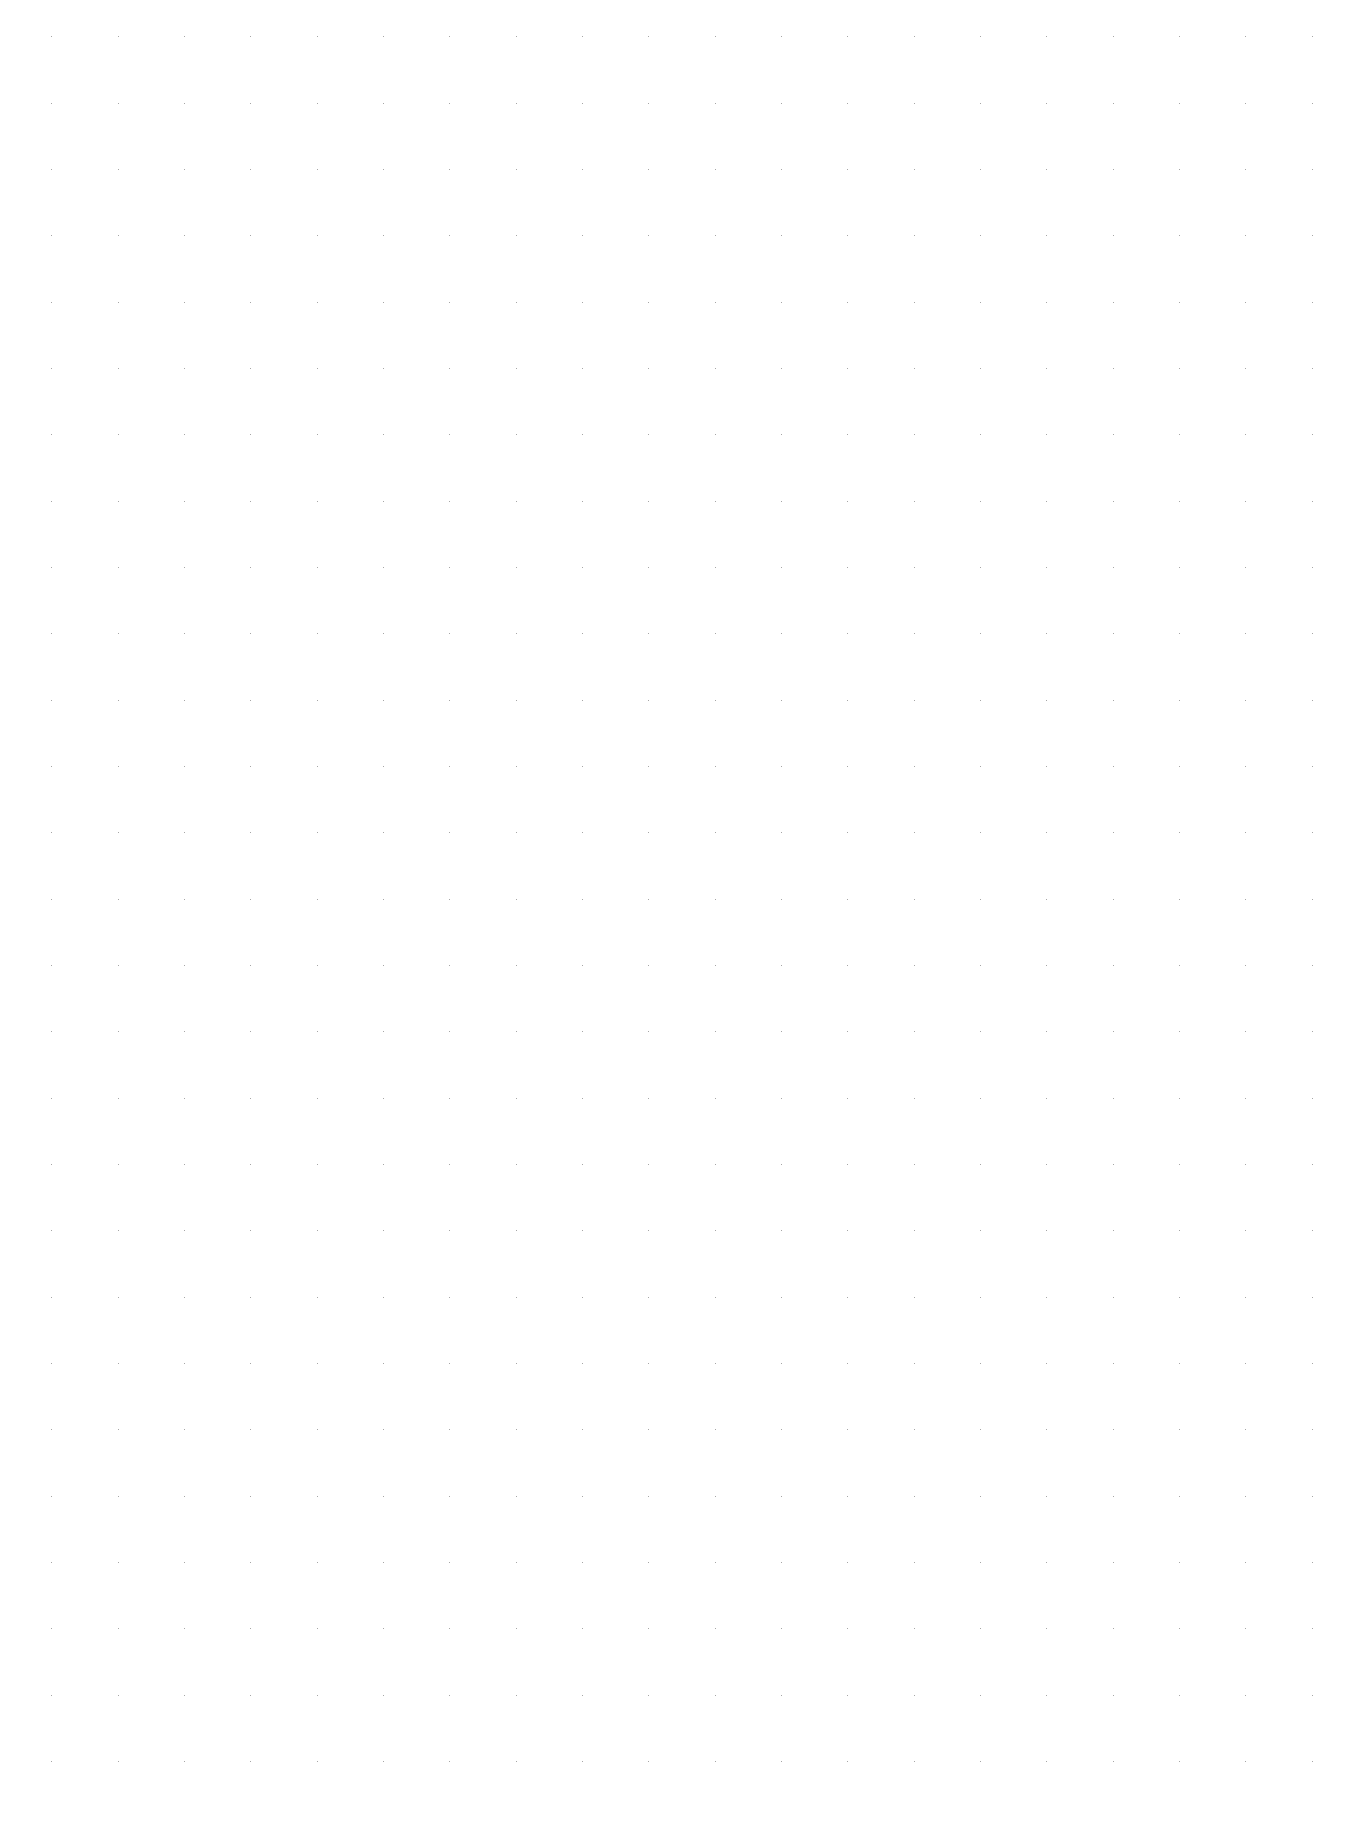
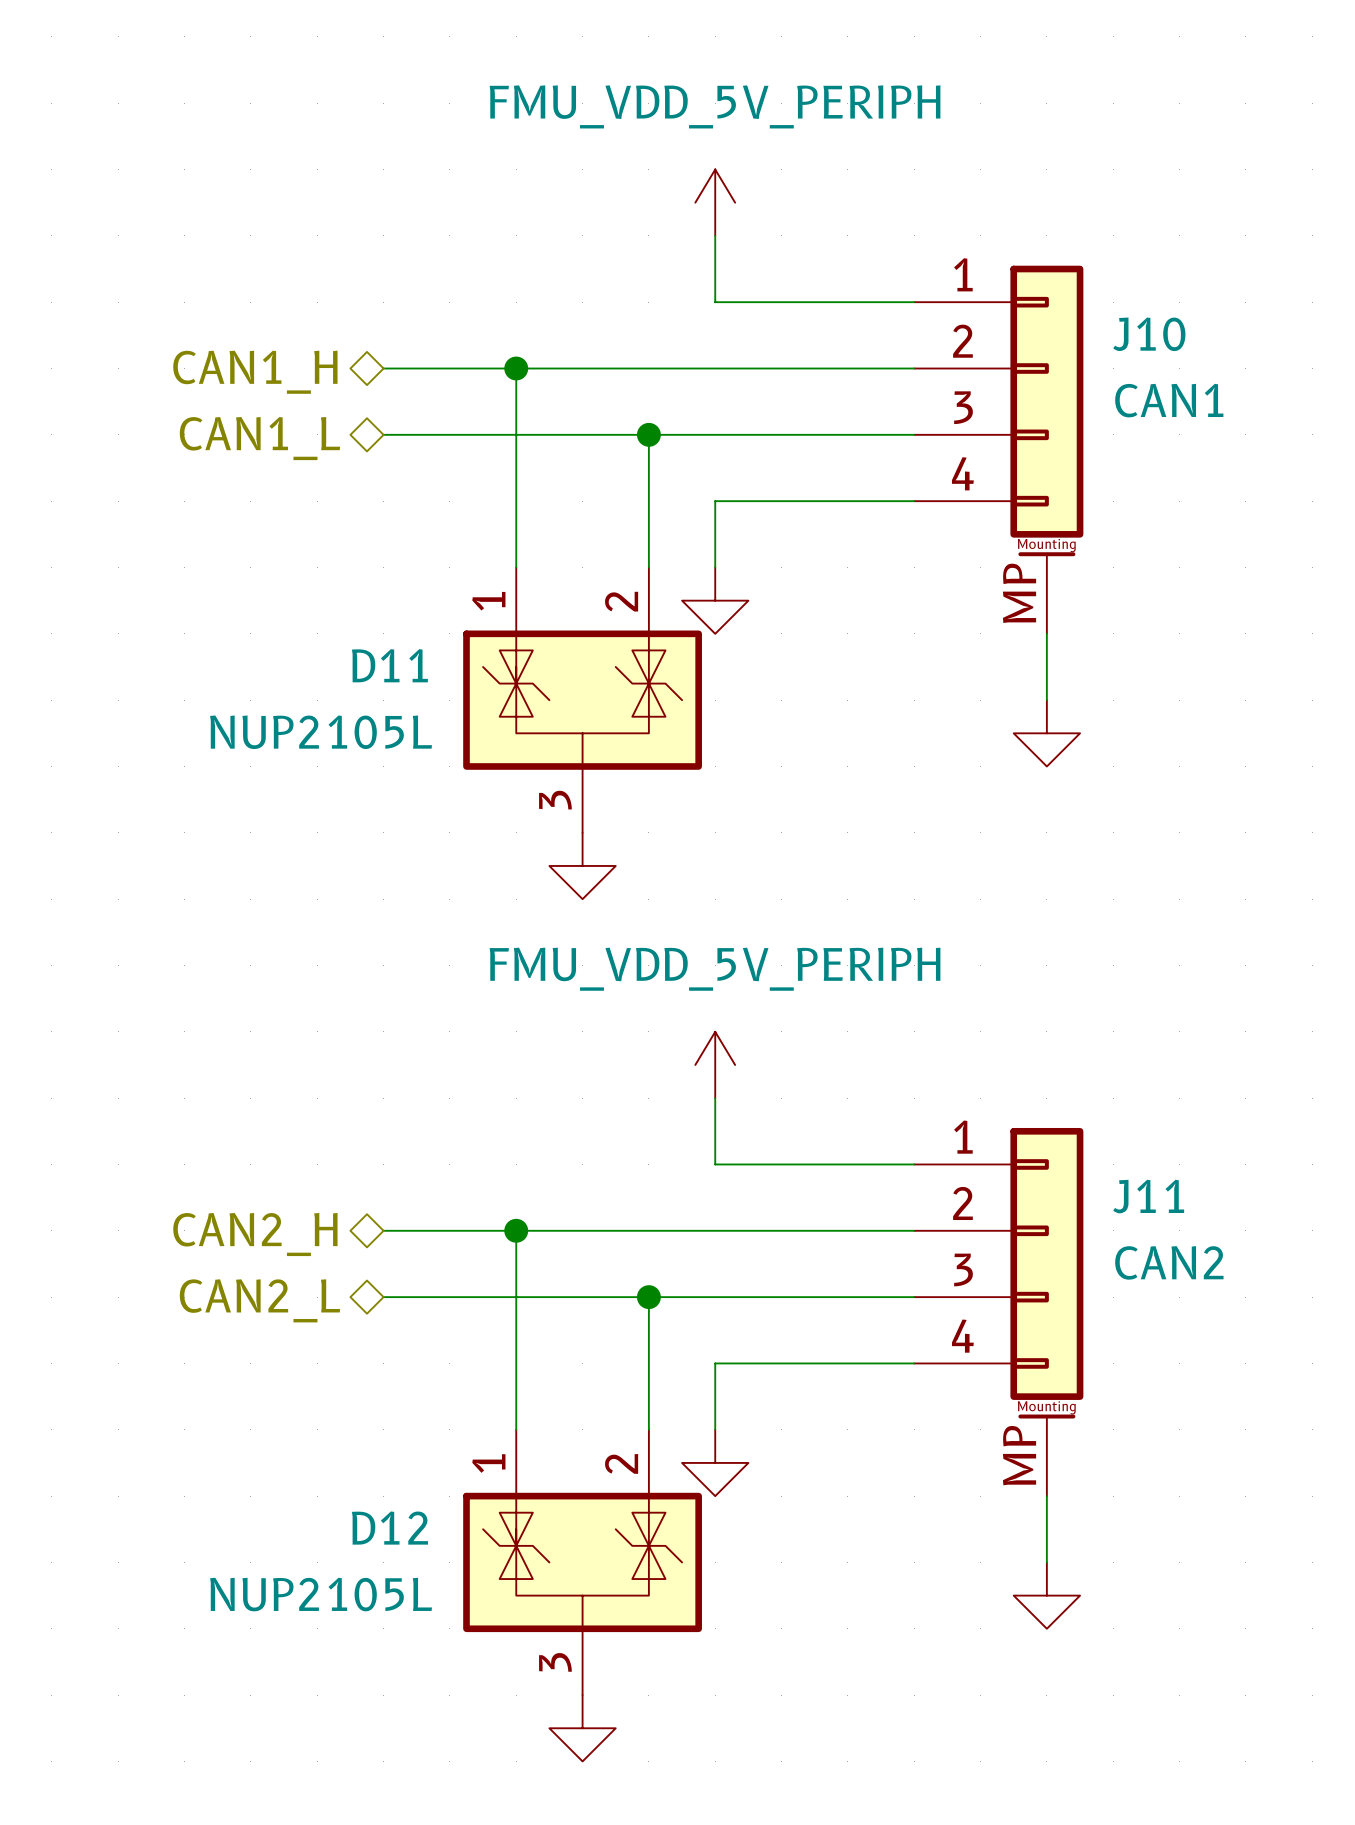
power symbol: none -> FMU_VDD_5V_PERIPH (715, 202)
wire: none -> (715, 235) (715, 302) (914, 302)
wire: none -> (383, 368) (914, 368)
wire: none -> (516, 368) (516, 567)
junction: none -> (516, 368)
hierarchical label: none -> CAN1_H (255, 372)
wire: none -> (383, 434) (914, 434)
wire: none -> (648, 434) (648, 567)
junction: none -> (648, 434)
hierarchical label: none -> CAN1_L (259, 438)
J10: none -> CAN1 (998, 449)
wire: none -> (914, 501) (715, 501) (715, 567)
power symbol: none -> (715, 600)
wire: none -> (1046, 633) (1046, 700)
D11: none -> NUP2105L (582, 700)
power symbol: none -> (1046, 733)
power symbol: none -> (582, 865)
power symbol: none -> FMU_VDD_5V_PERIPH (715, 1064)
wire: none -> (715, 1098) (715, 1164) (914, 1164)
wire: none -> (383, 1230) (914, 1230)
wire: none -> (516, 1230) (516, 1429)
junction: none -> (516, 1230)
hierarchical label: none -> CAN2_H (255, 1234)
wire: none -> (383, 1297) (914, 1297)
wire: none -> (648, 1297) (648, 1429)
junction: none -> (648, 1297)
hierarchical label: none -> CAN2_L (259, 1300)
J11: none -> CAN2 (998, 1312)
wire: none -> (914, 1363) (715, 1363) (715, 1429)
power symbol: none -> (715, 1462)
wire: none -> (1046, 1496) (1046, 1562)
D12: none -> NUP2105L (582, 1562)
power symbol: none -> (1046, 1595)
power symbol: none -> (582, 1728)

